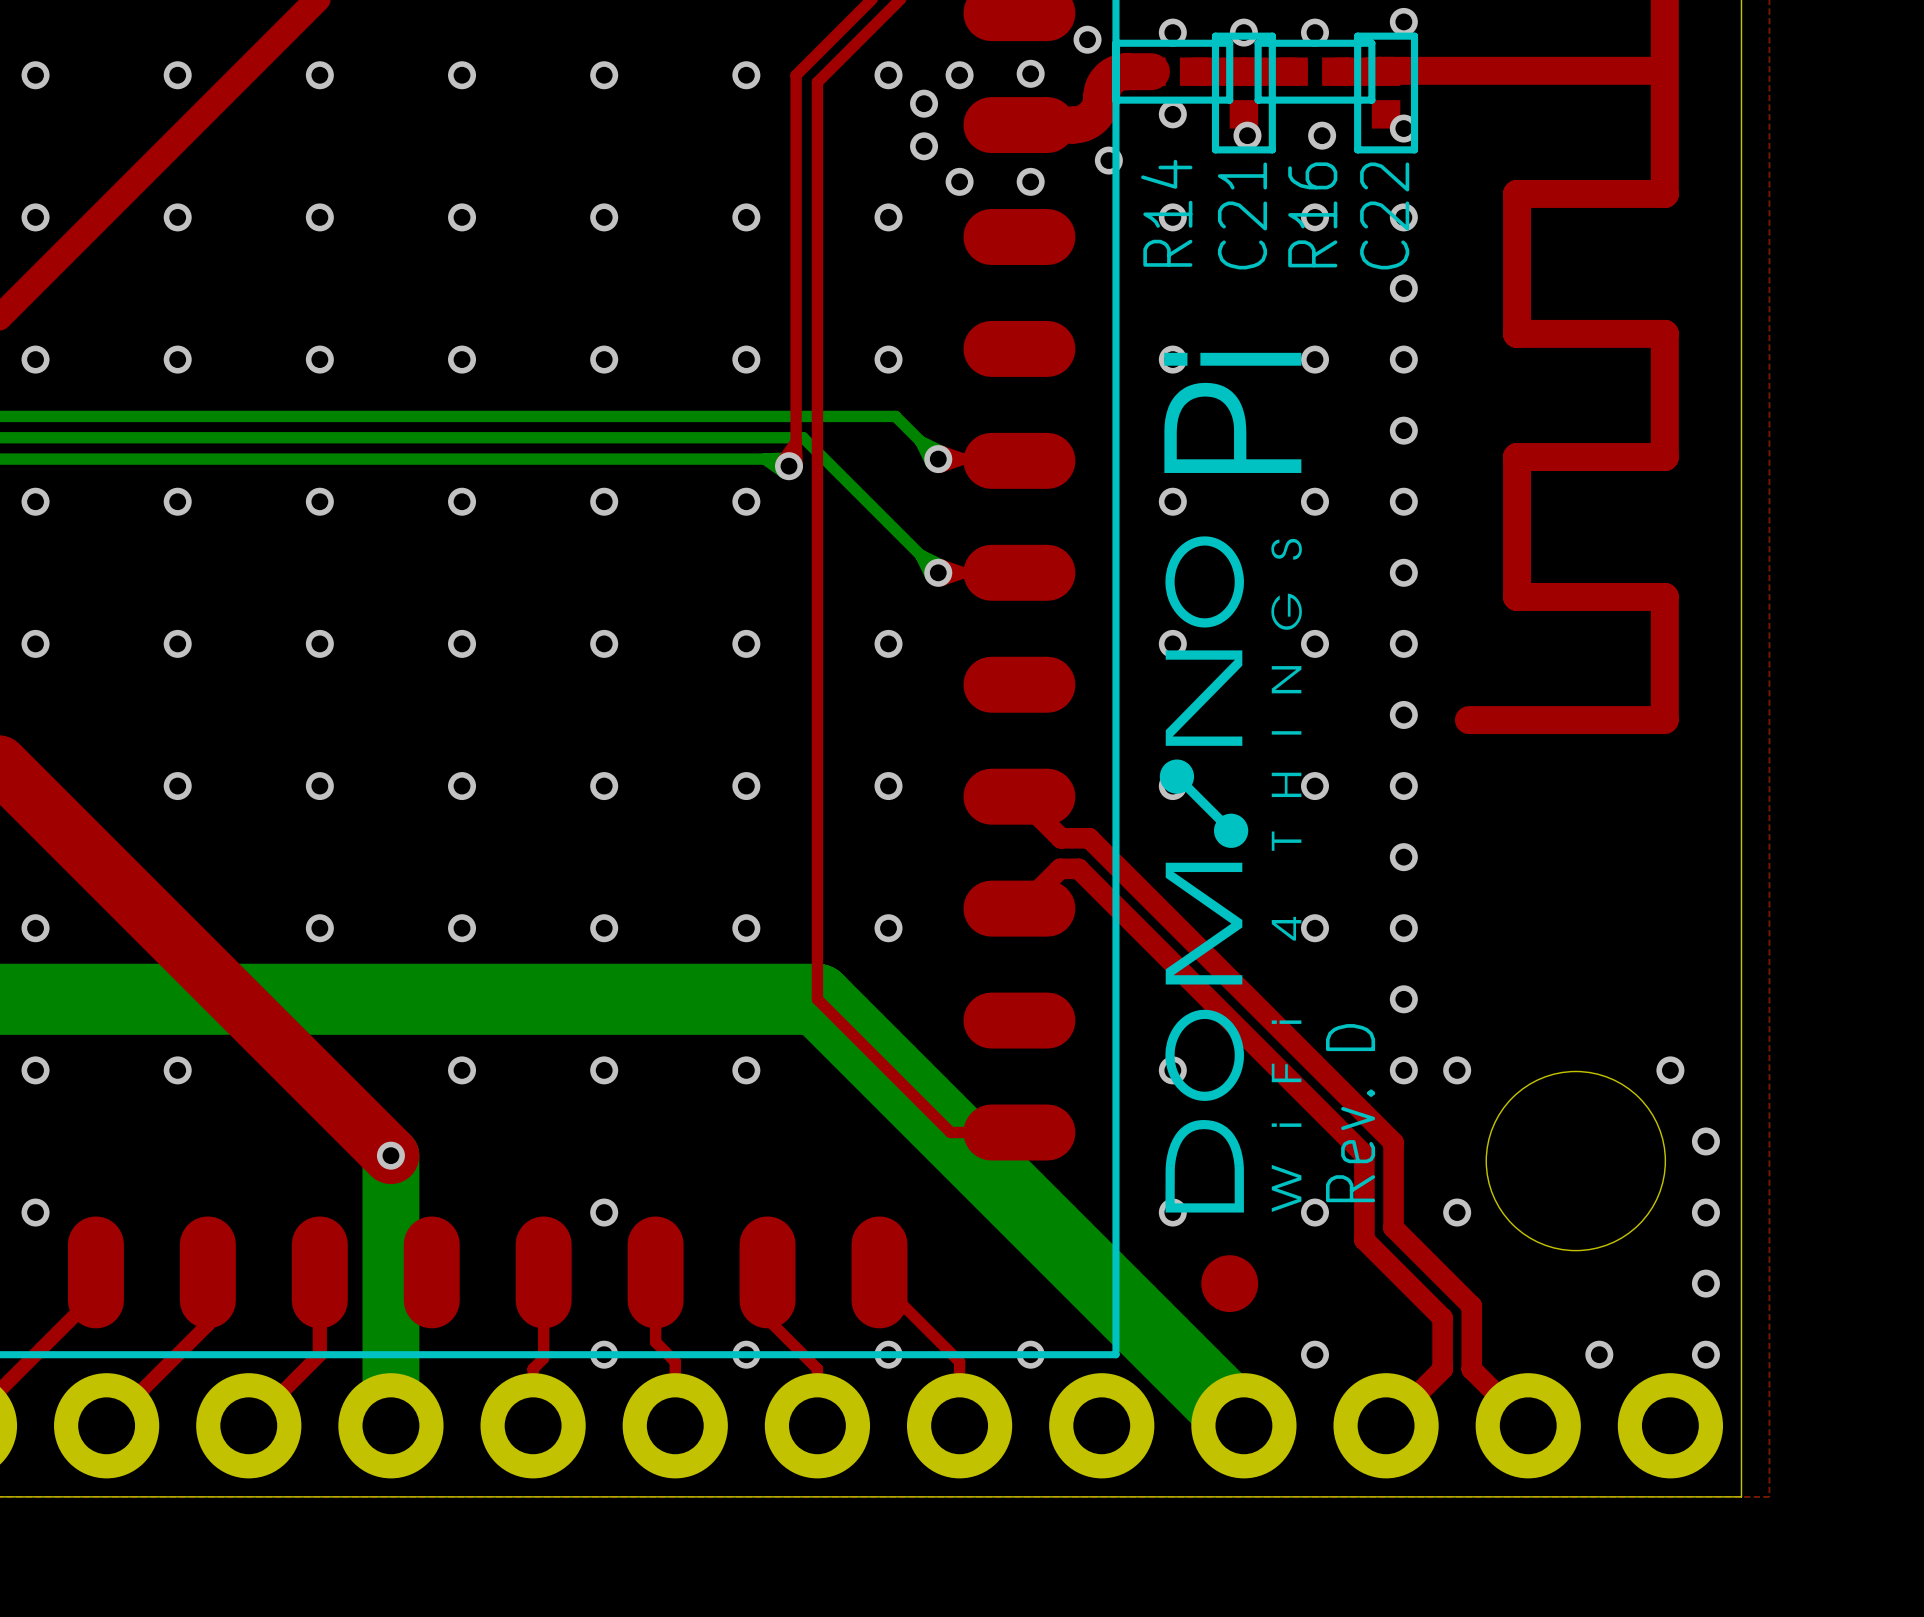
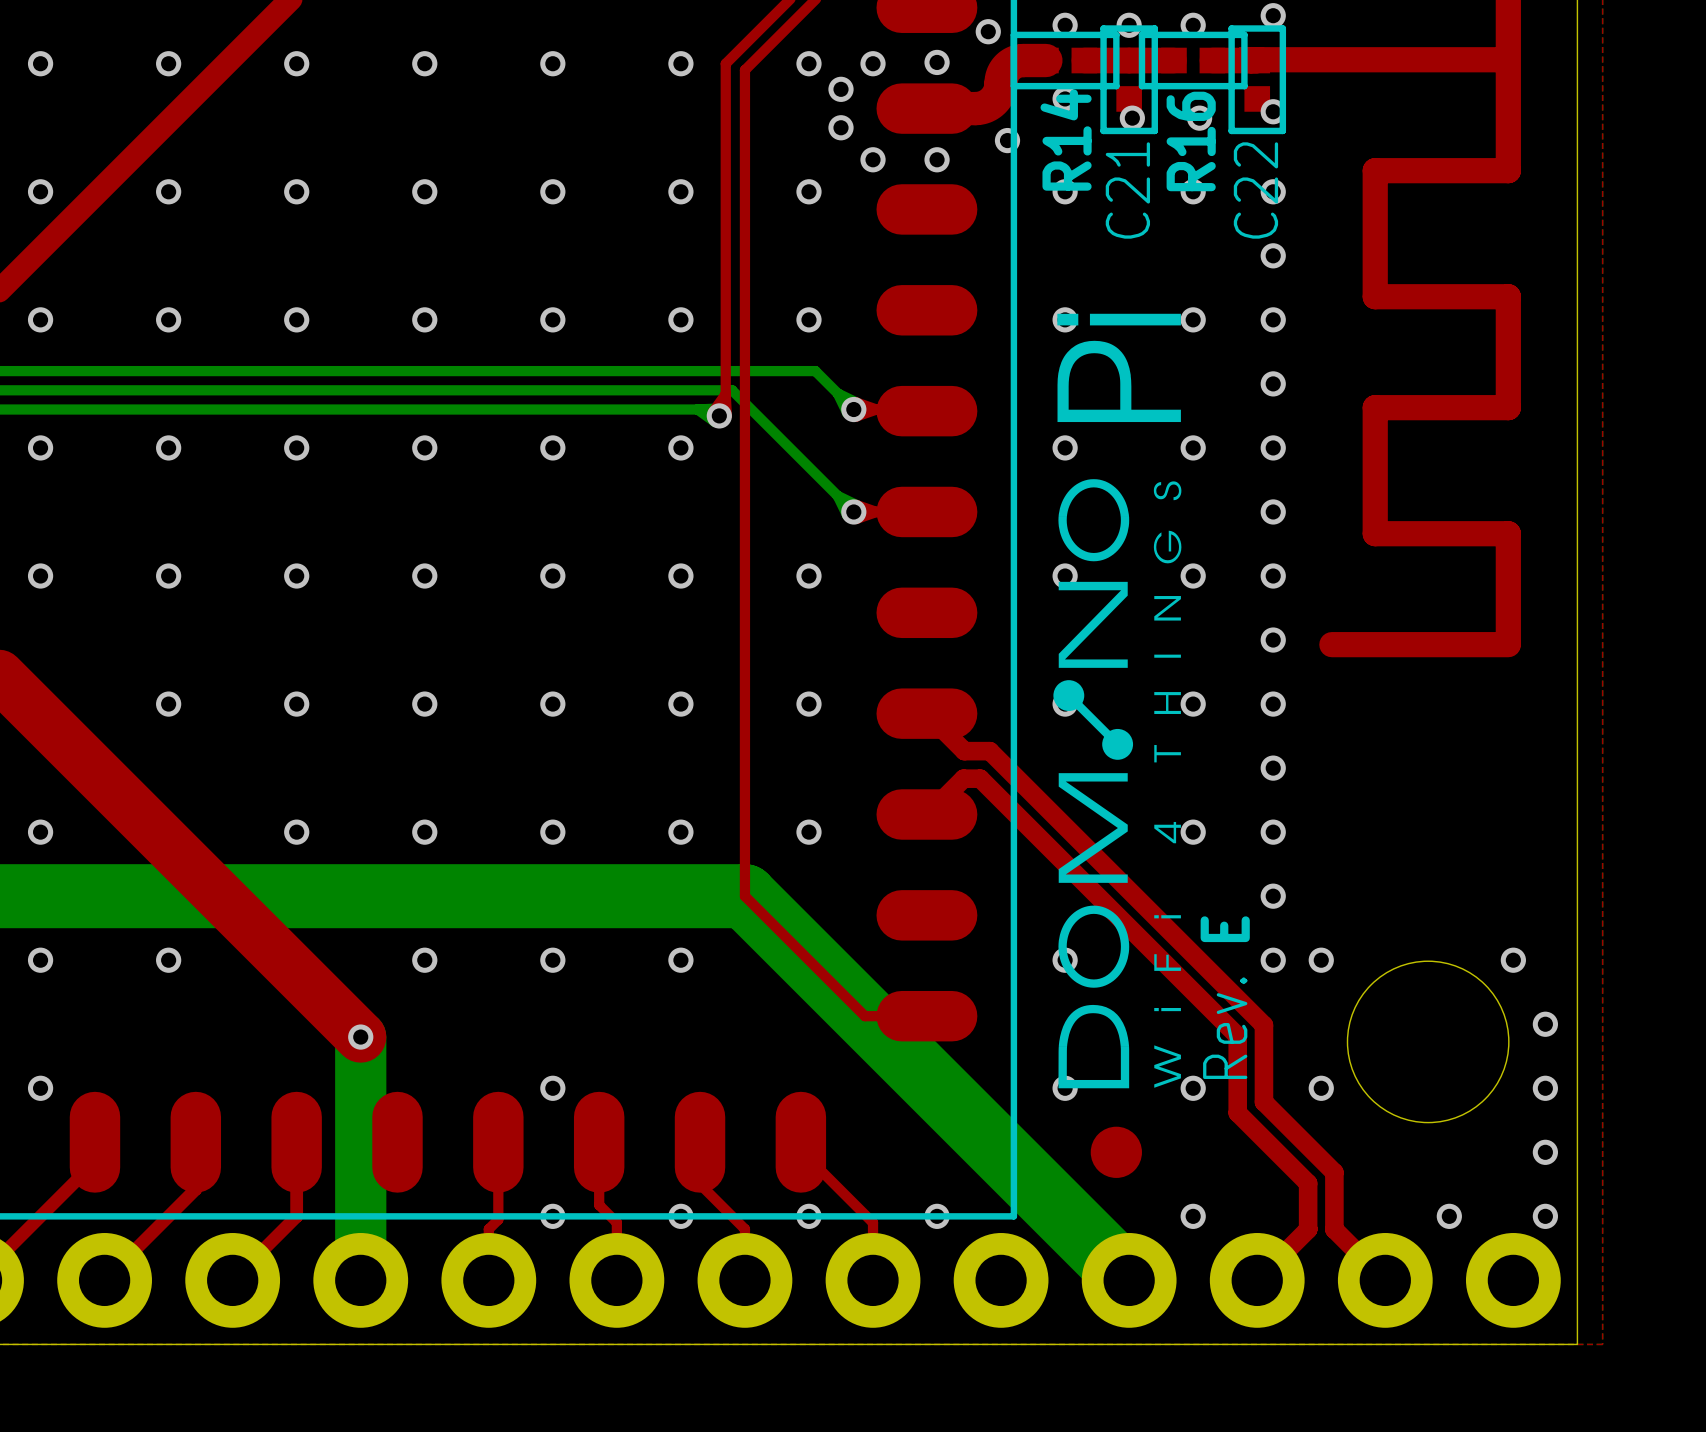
R14 name position: R14 (1166, 213) -> R14 (1066, 140)
R16 name position: R16 (1312, 214) -> R16 (1191, 141)
text: D (1350, 1037) -> E (1225, 929)

